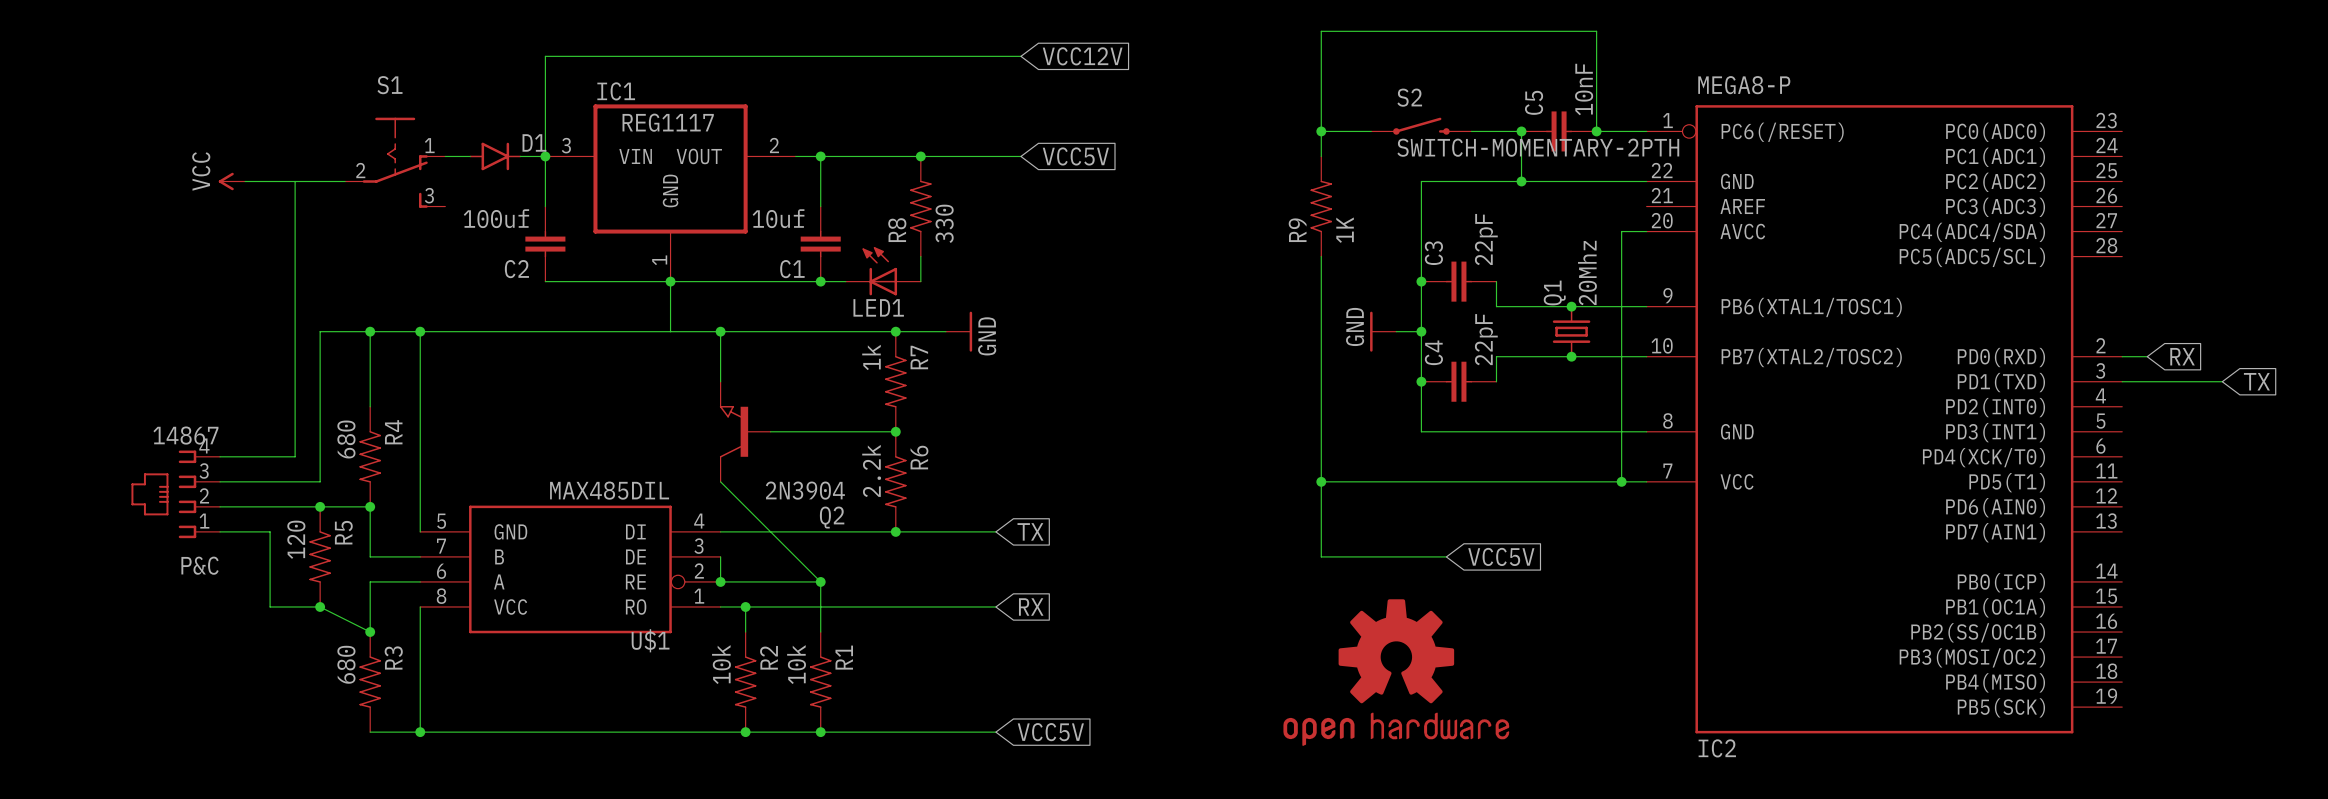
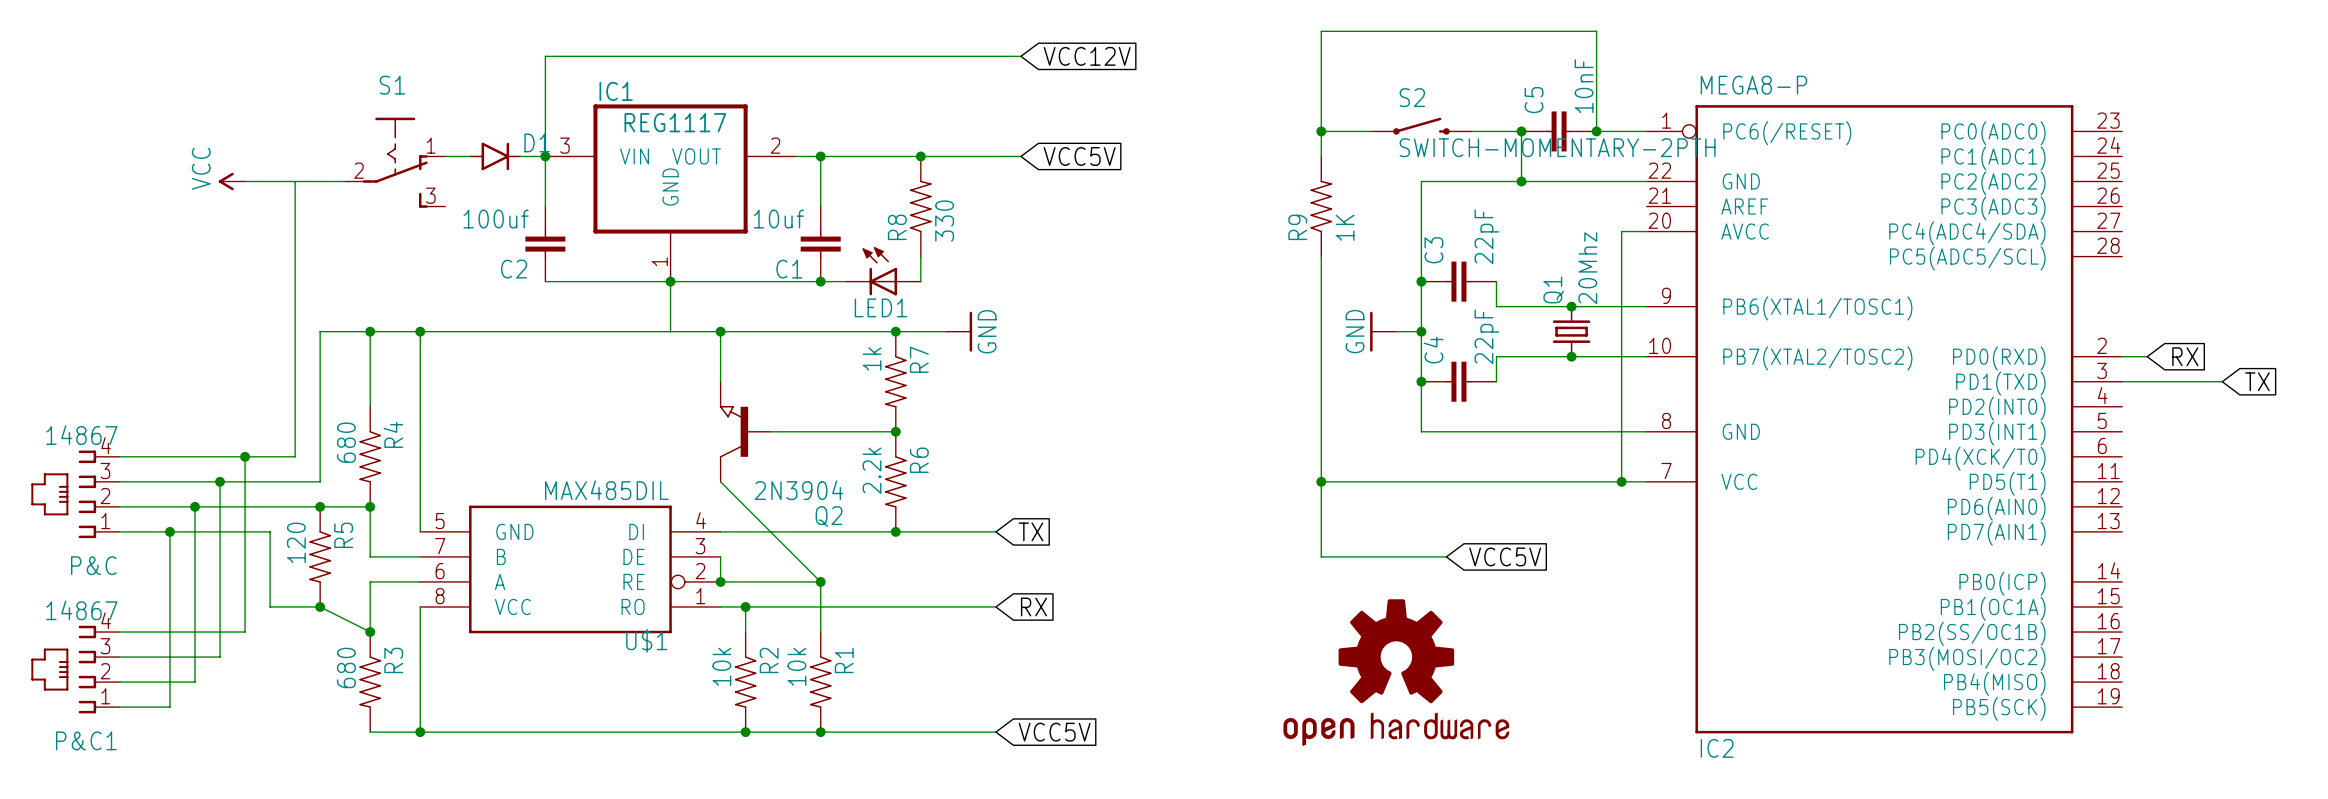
wire: none -> (119, 456) (220, 456)
wire: none -> (245, 456) (245, 632) (119, 632)
junction: none -> (245, 456)
wire: none -> (119, 481) (220, 481) (220, 657) (119, 657)
junction: none -> (220, 481)
P&C position: (175, 494) -> (75, 494)
wire: none -> (119, 506) (220, 506)
wire: none -> (195, 506) (195, 682) (119, 682)
junction: none -> (195, 506)
wire: none -> (119, 531) (220, 531)
wire: none -> (169, 531) (169, 707) (119, 707)
junction: none -> (169, 531)
P&C1: none -> 14867 (75, 669)

